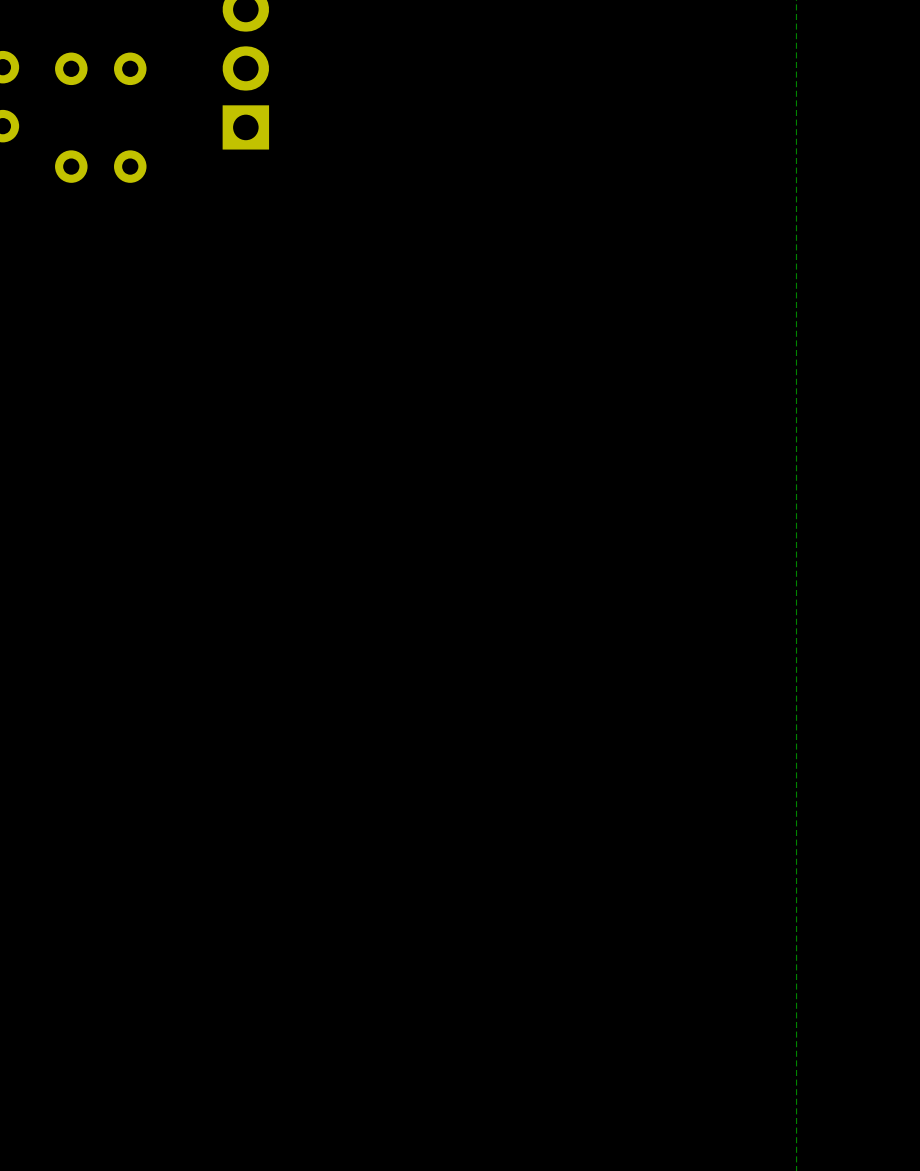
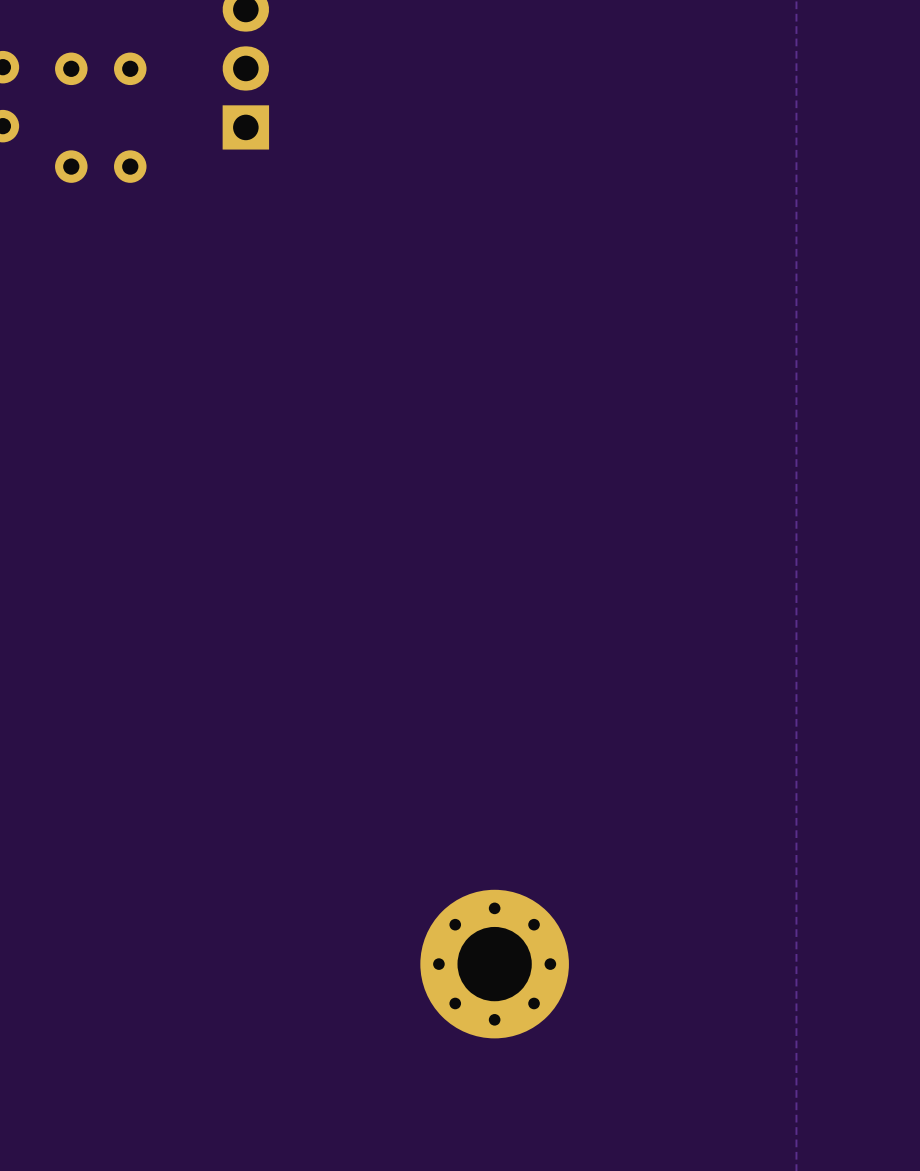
part: none -> (494, 964)

